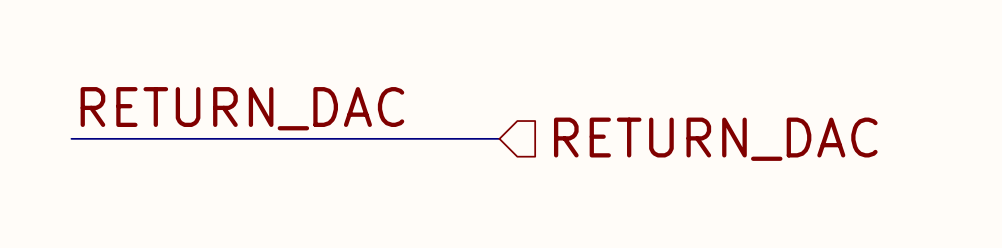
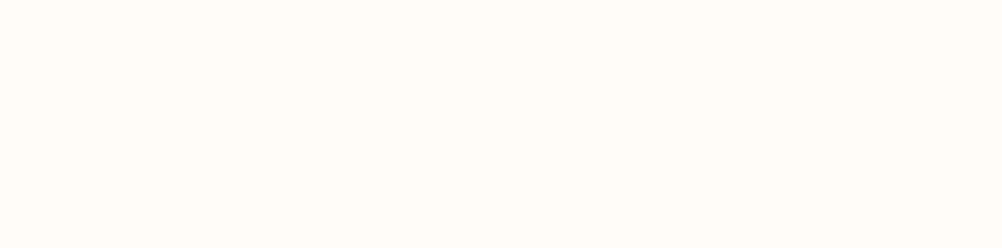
label: RETURN_DAC (242, 108) -> none
wire: (71, 138) (499, 138) -> none
hierarchical label: RETURN_DAC (715, 139) -> none

